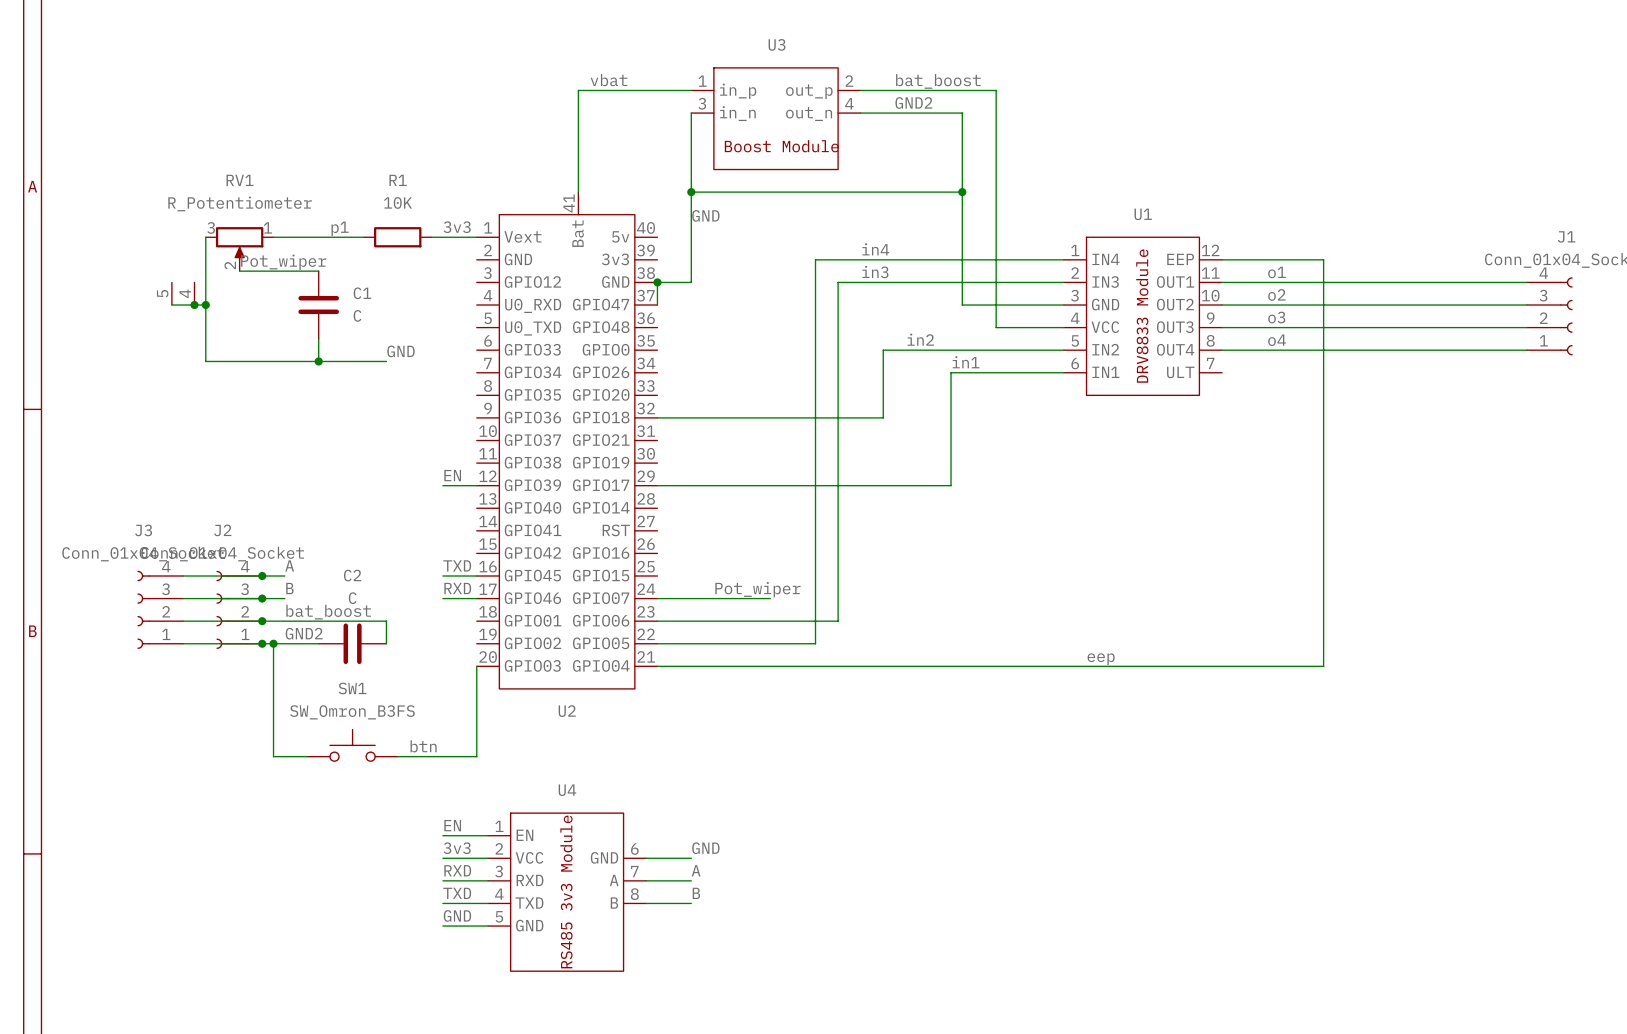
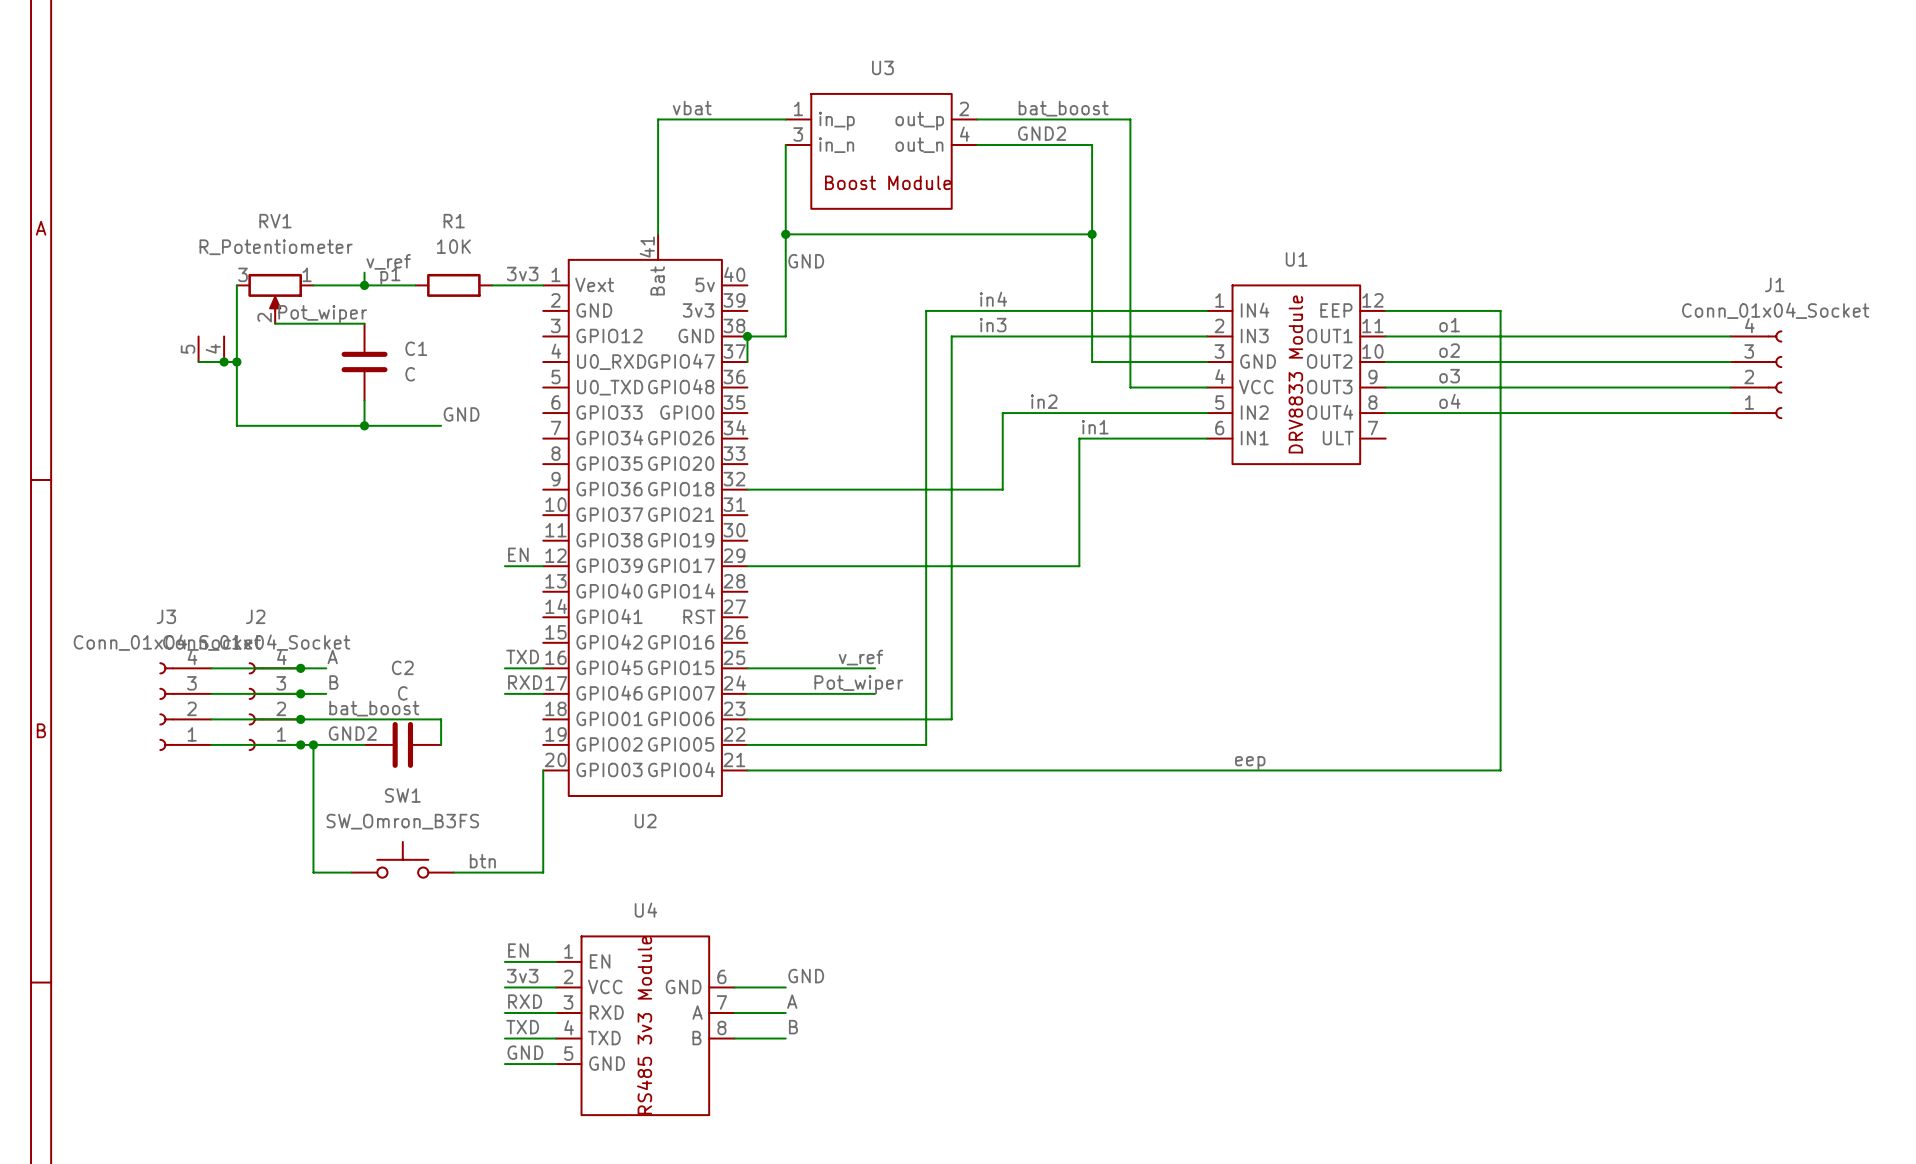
label: none -> v_ref (388, 261)
wire: none -> (364, 272) (364, 285)
junction: none -> (364, 285)
label: none -> v_ref (860, 657)
wire: none -> (747, 668) (875, 668)

